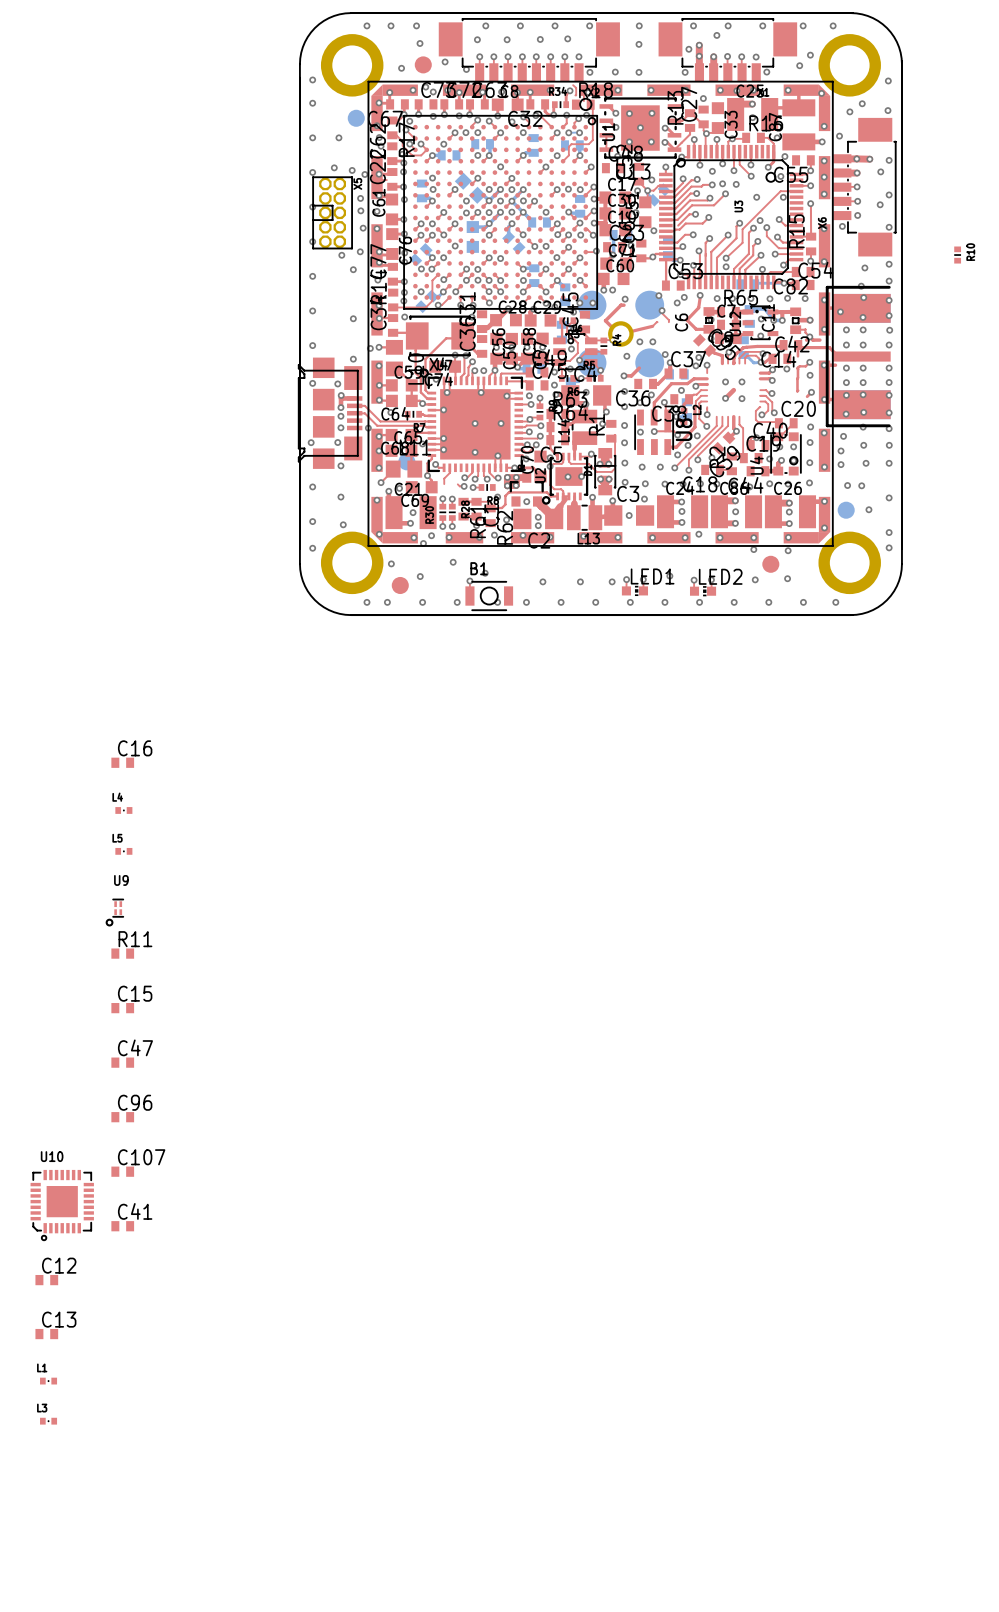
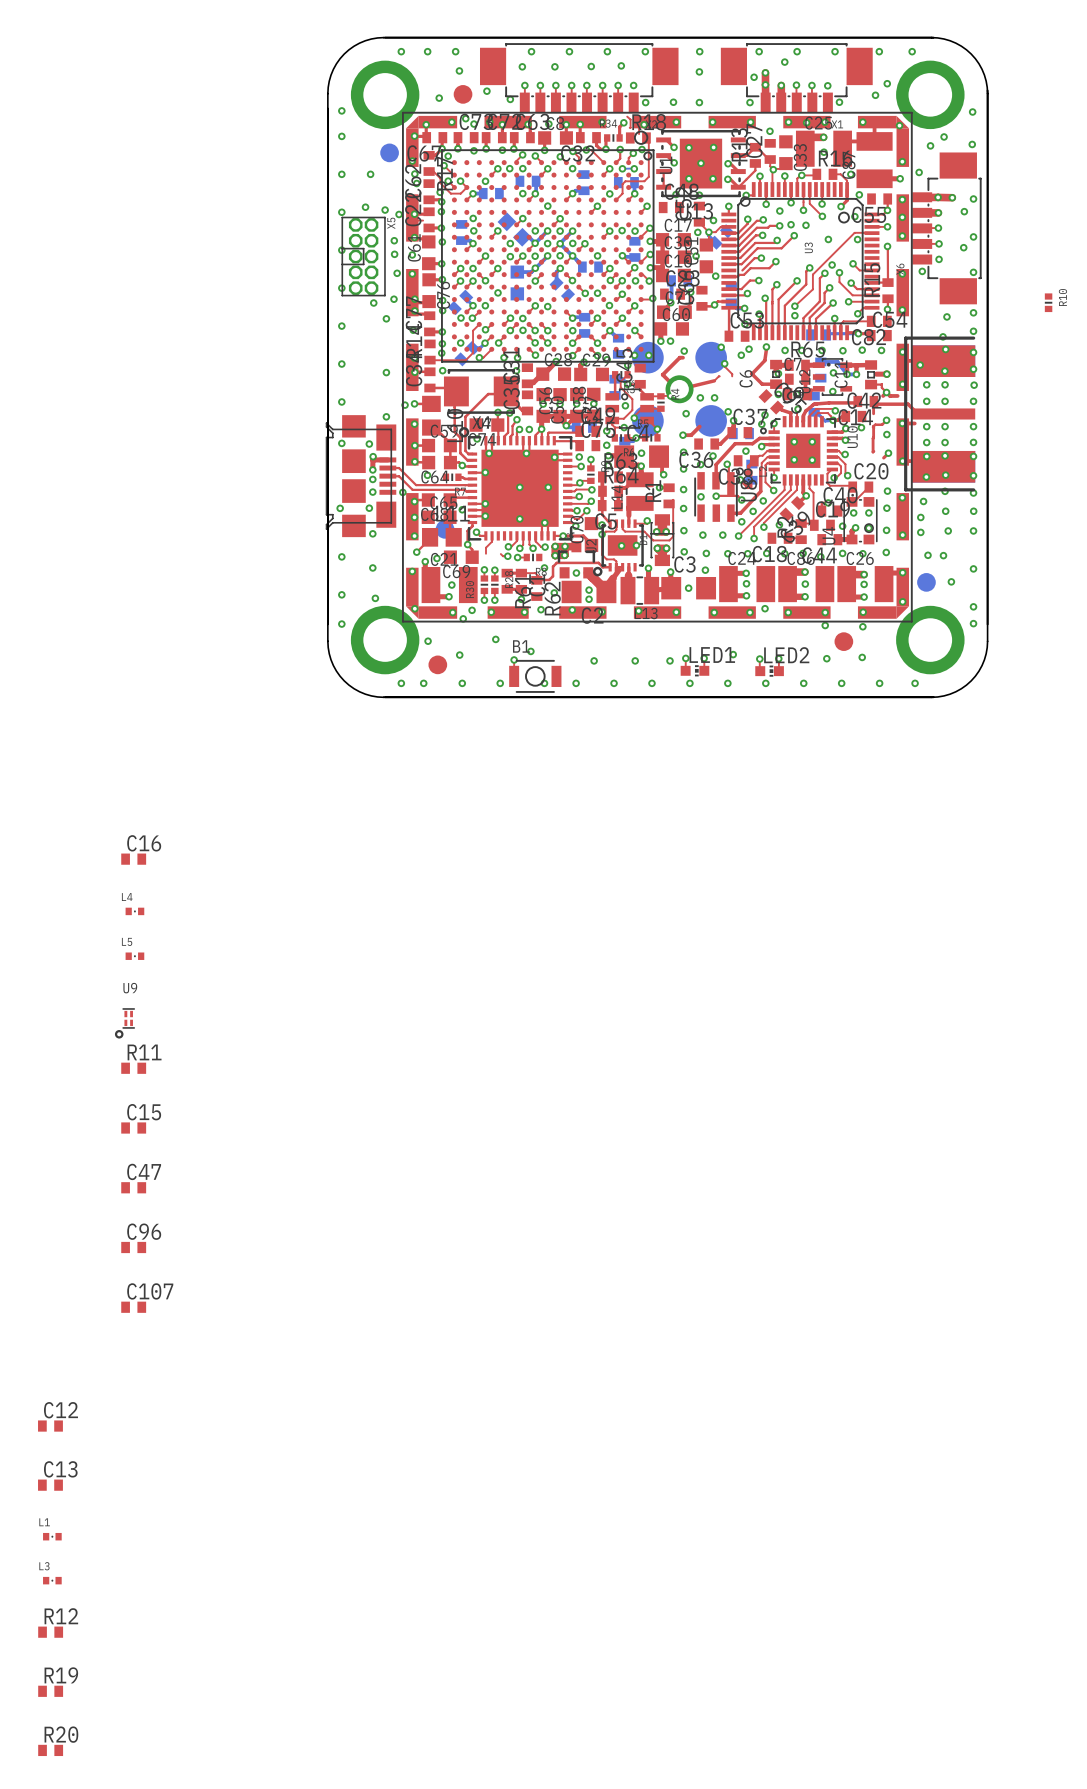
U10 rotation: 0° (62, 1205) -> 90° clockwise (798, 450)
U10 position: (62, 1205) -> (798, 450)
C41: (122, 1226) -> none
R12: none -> (50, 1632)
R19: none -> (50, 1691)
R20: none -> (50, 1750)

